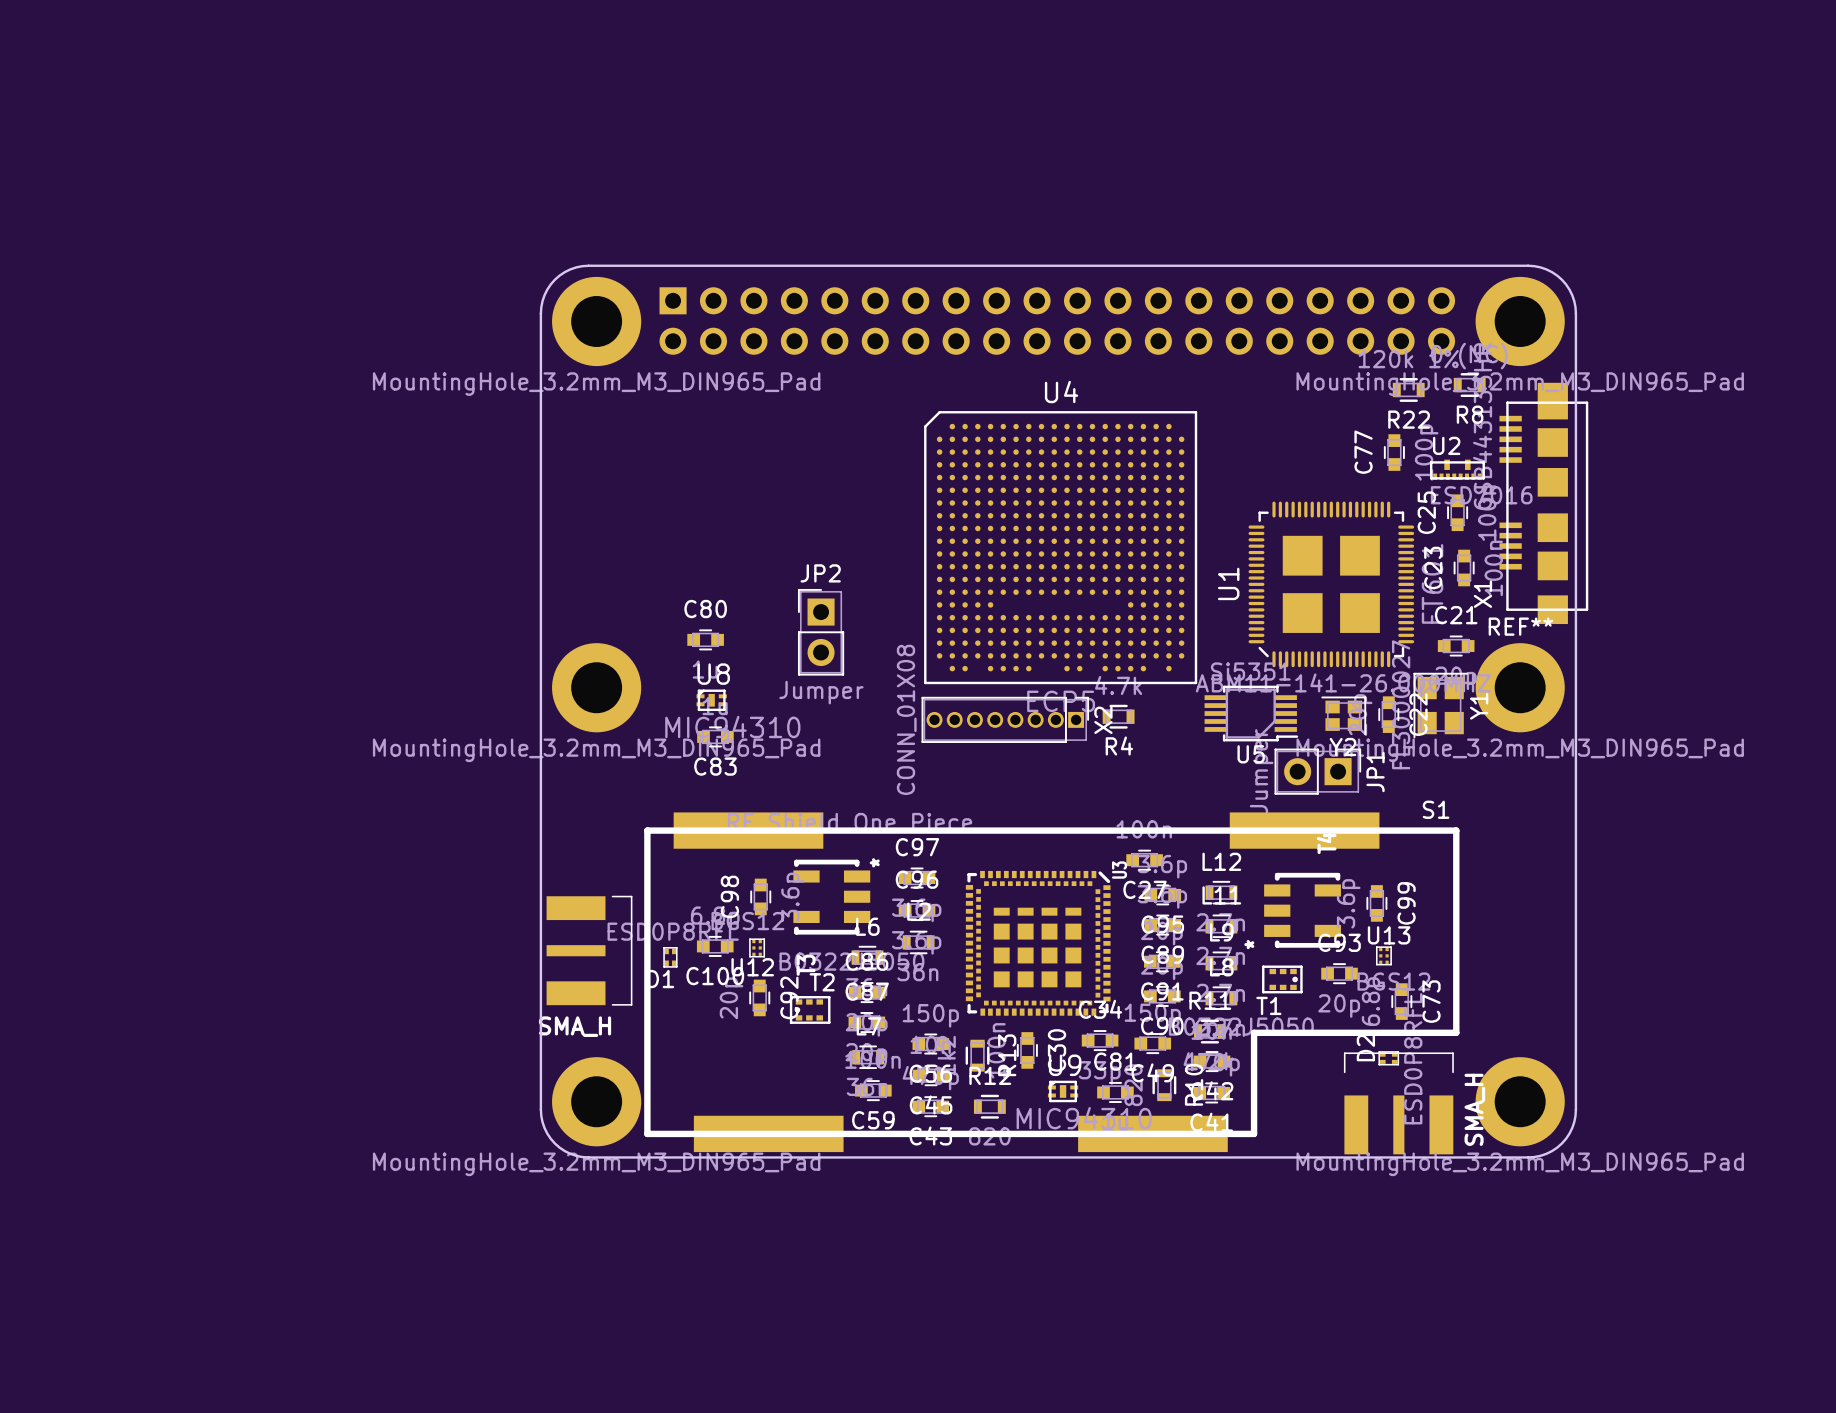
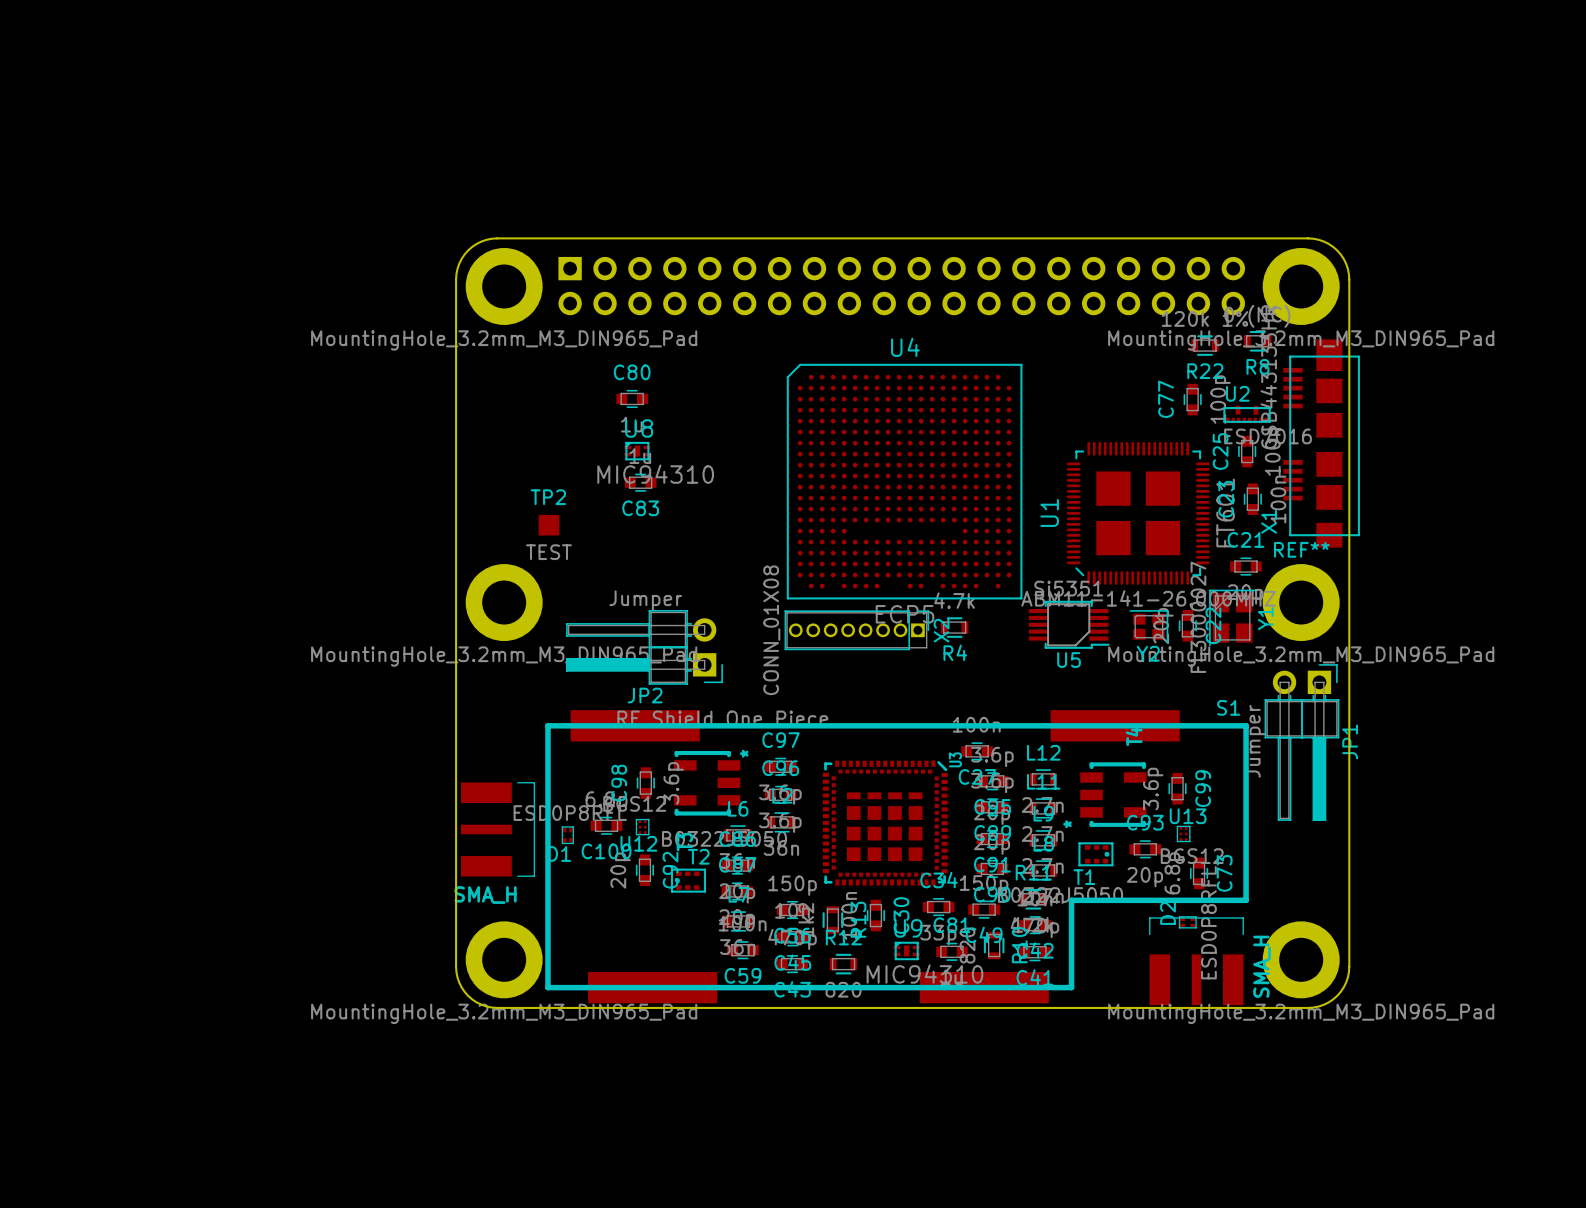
JP2 name position: JP2 (820, 573) -> JP2 (645, 695)
JP2 footprint: [797, 588, 845, 676] -> [566, 610, 723, 685]
TP2: none -> TEST (548, 525)
C80 position: (705, 639) -> (632, 398)
JP2 value position: Jumper (821, 692) -> Jumper (645, 600)
U8 position: (711, 700) -> (637, 451)
C83 position: (715, 736) -> (640, 482)
JP1 footprint: [1274, 748, 1362, 795] -> [1264, 664, 1340, 821]

